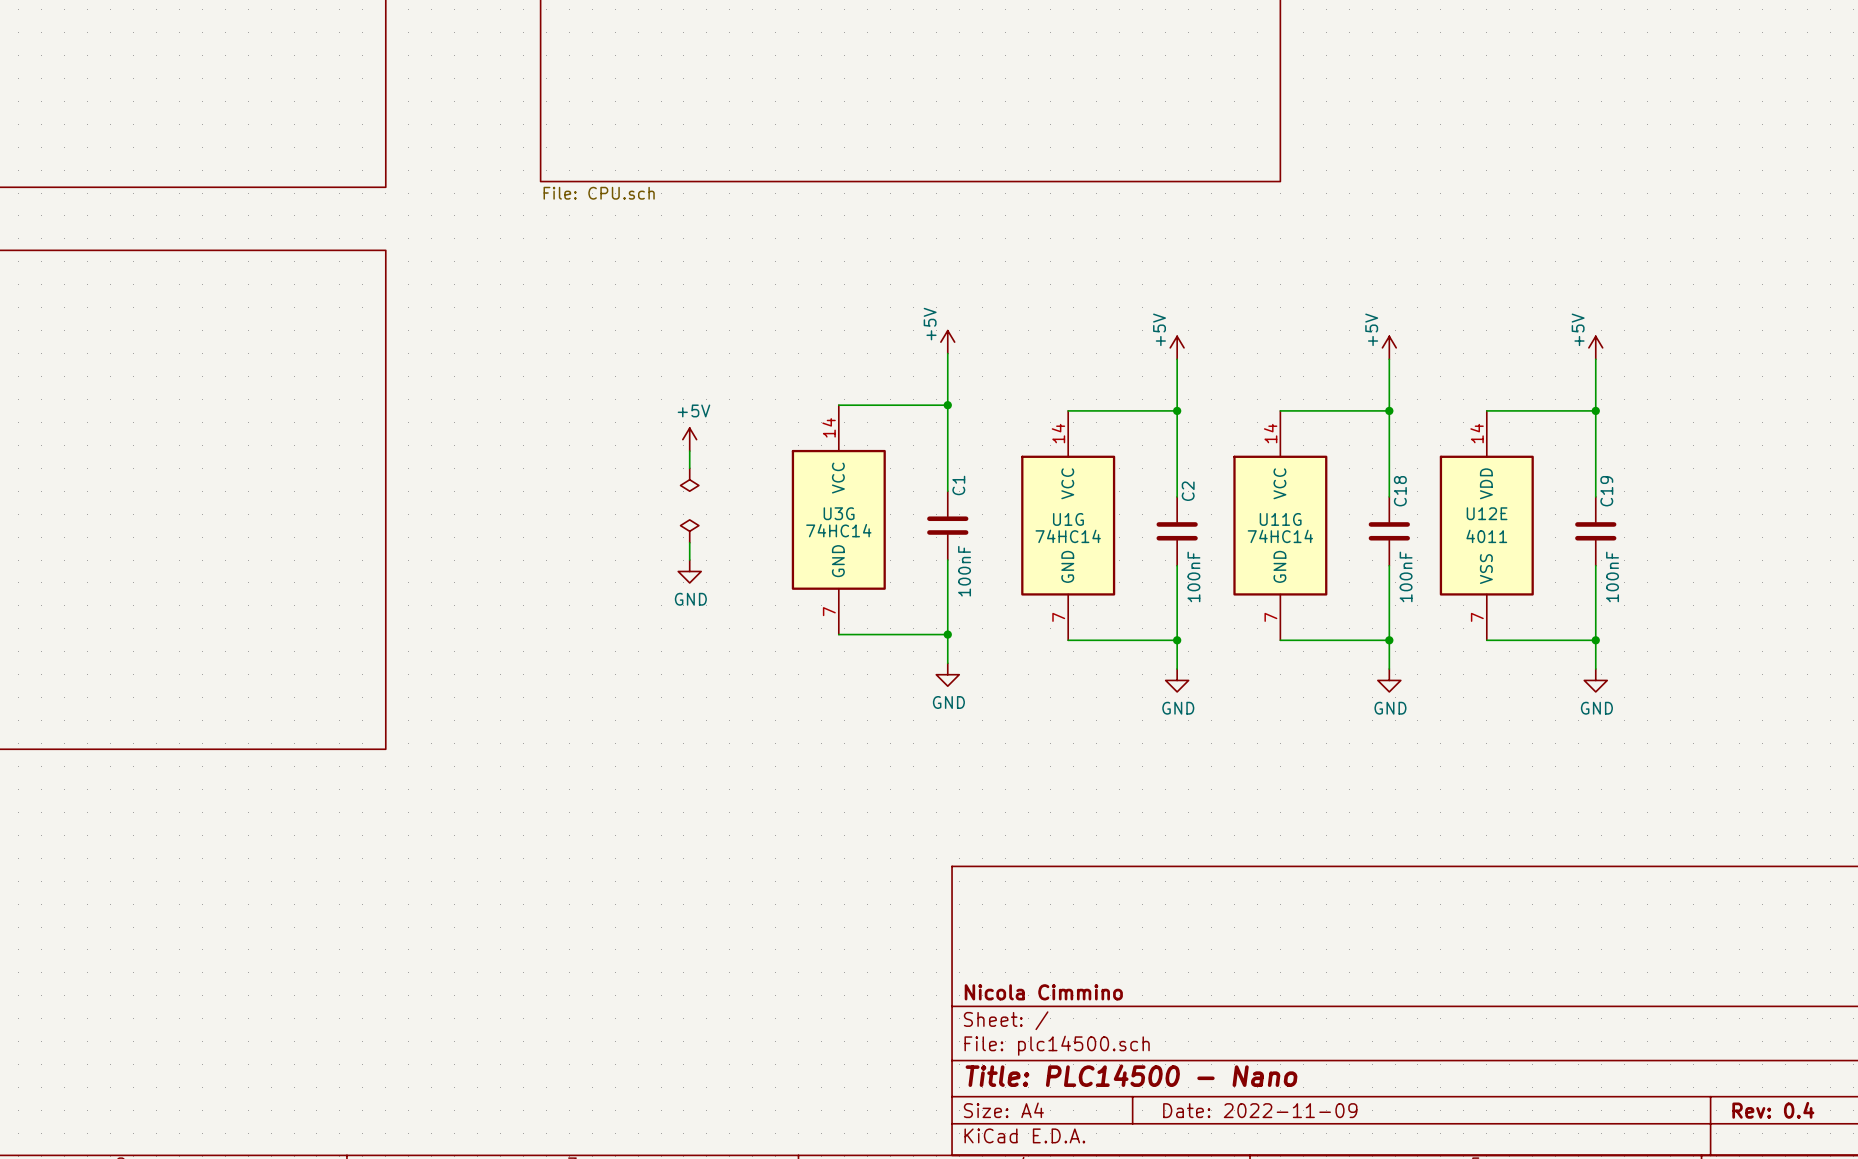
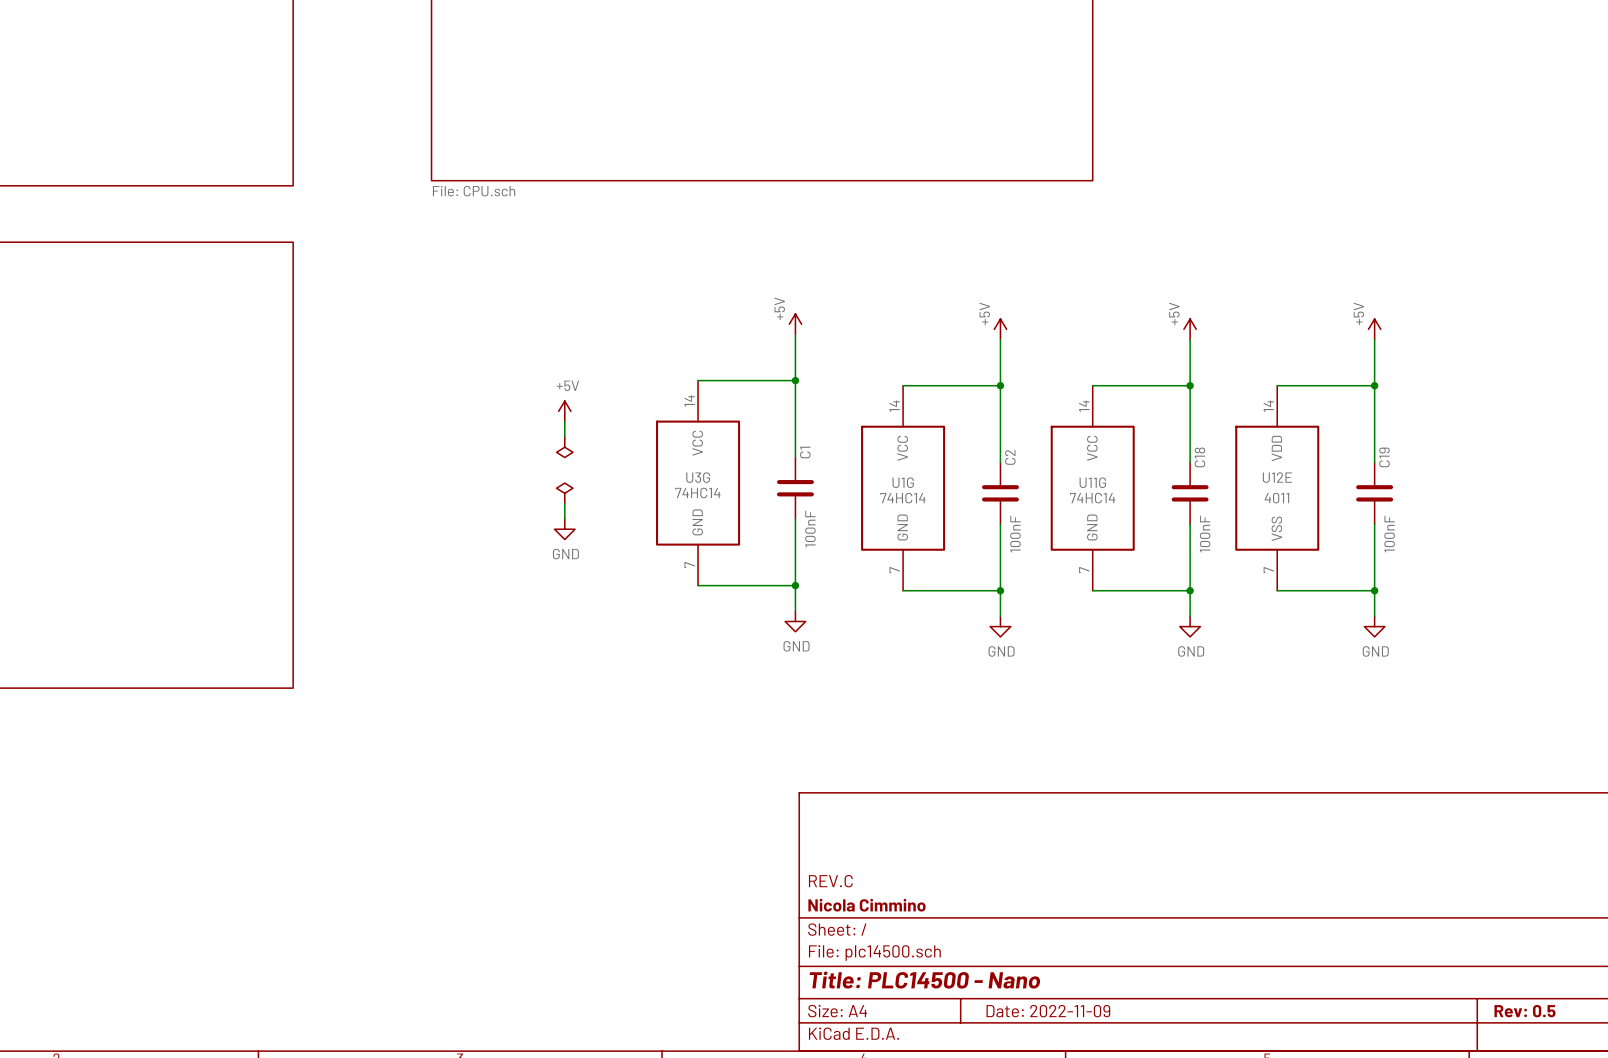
title block: none -> REV.C (830, 881)
title block: Rev: 0.4 (1773, 1110) -> Rev: 0.5 (1524, 1011)

